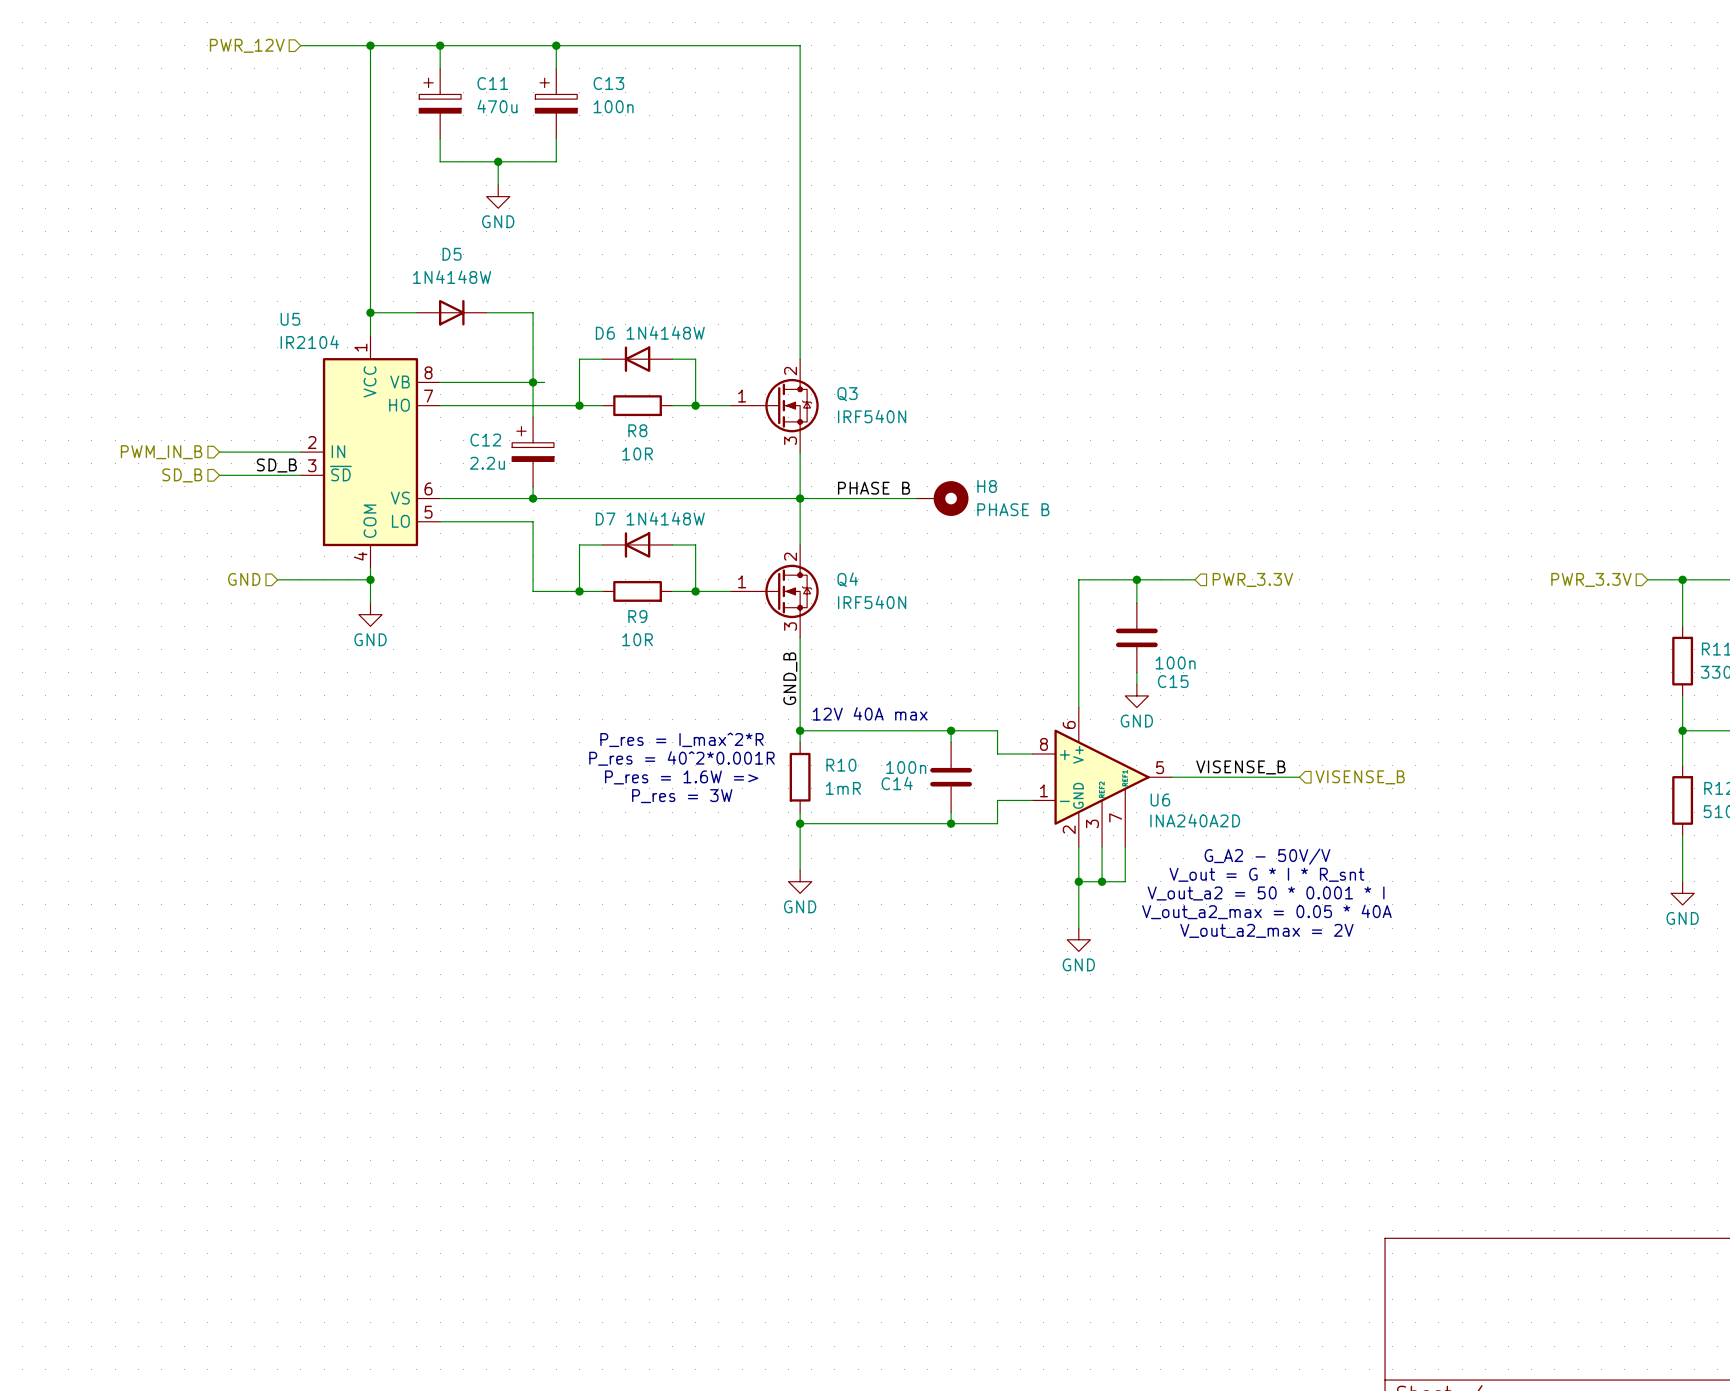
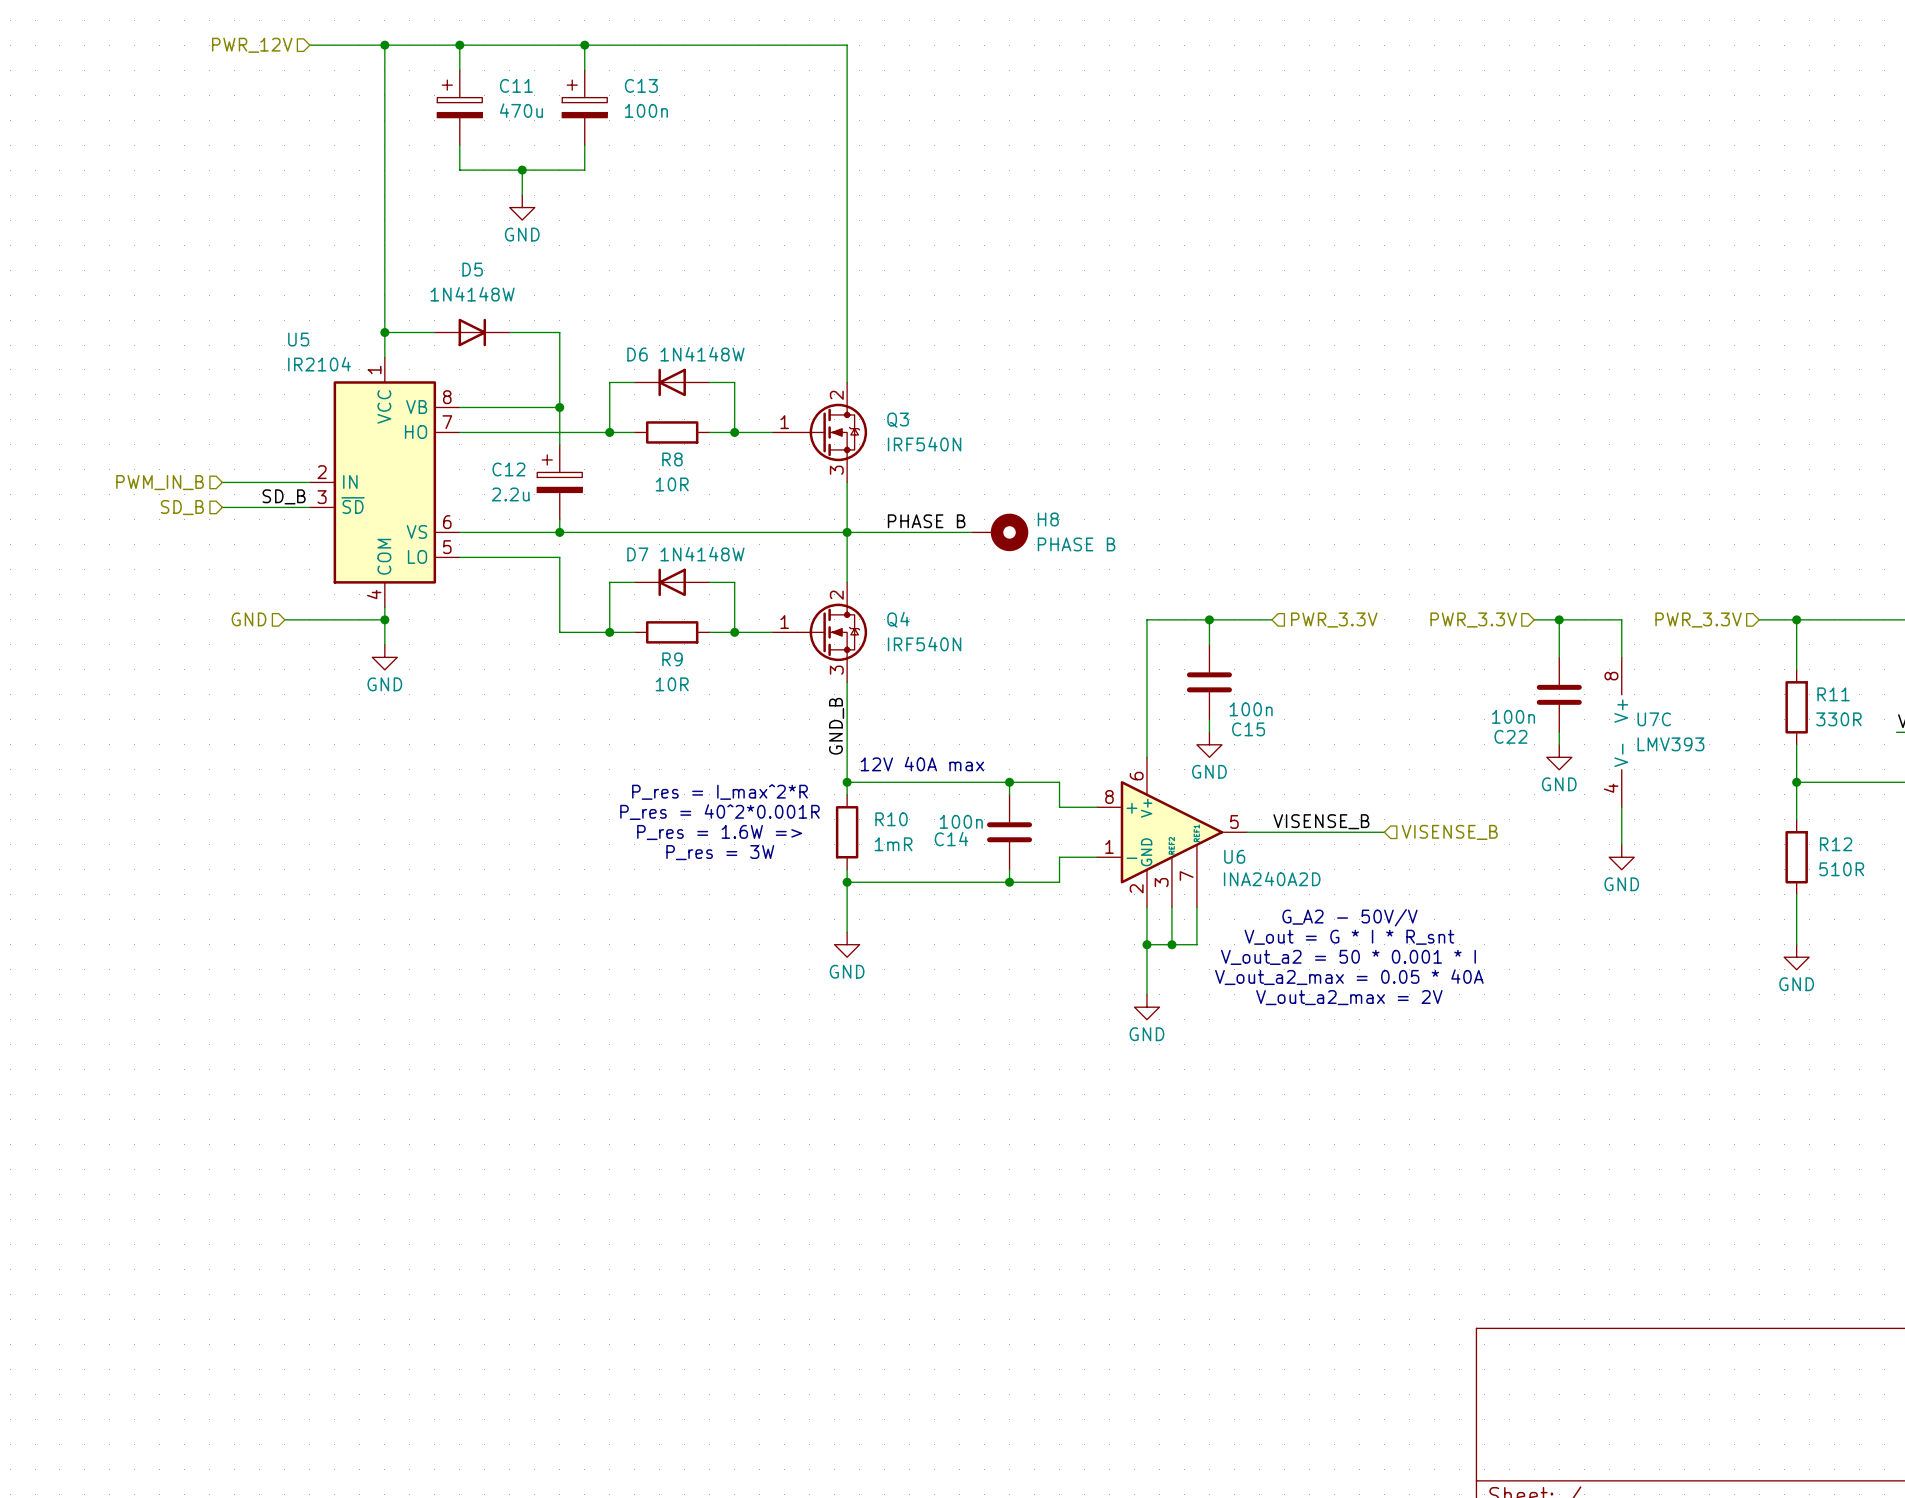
wire: (533, 382) (544, 382) -> none
hierarchical label: none -> PWR_3.3V (1473, 620)
wire: none -> (1534, 619) (1621, 619) (1621, 657)
wire: none -> (1559, 619) (1559, 657)
junction: none -> (1559, 619)
C22: none -> 100n (1559, 694)
wire: none -> (1559, 732) (1559, 744)
U7C: none -> LMV393 (1621, 732)
power symbol: none -> GND (1559, 757)
wire: none -> (1621, 807) (1621, 844)
power symbol: none -> GND (1621, 857)

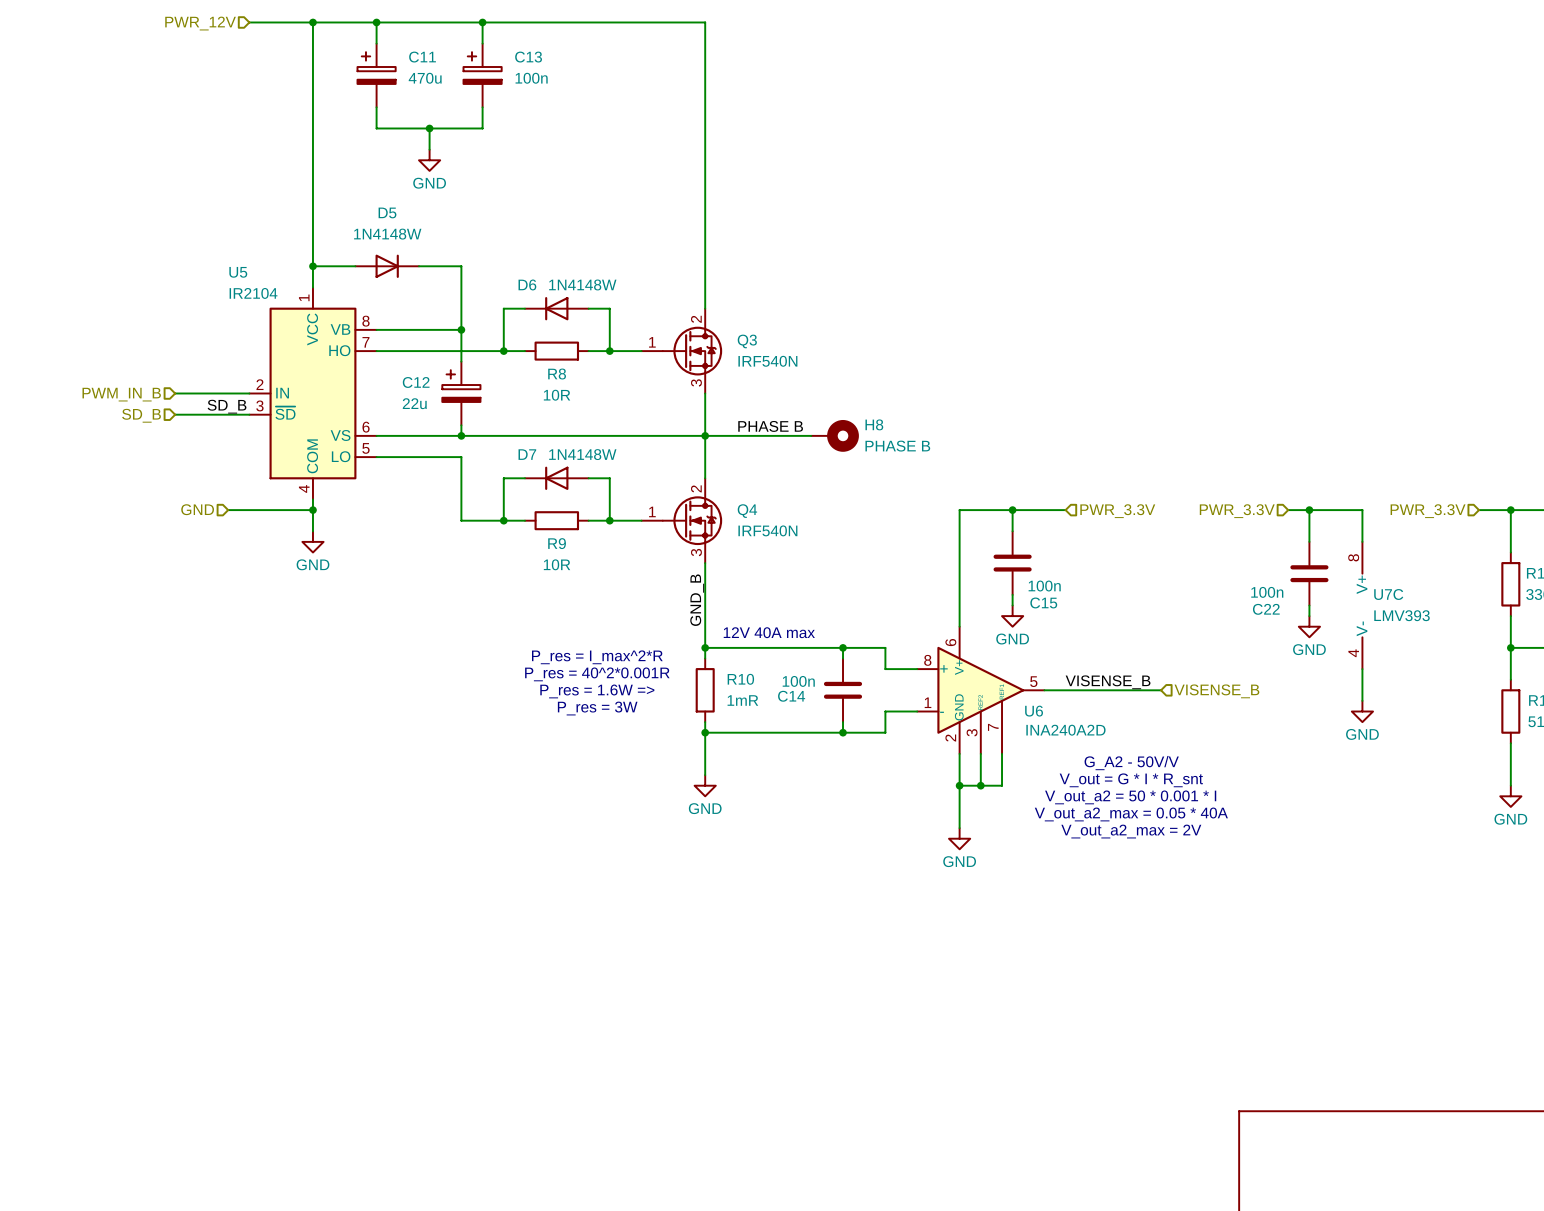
C12 value: 2.2u (510, 494) -> 22u (414, 403)

